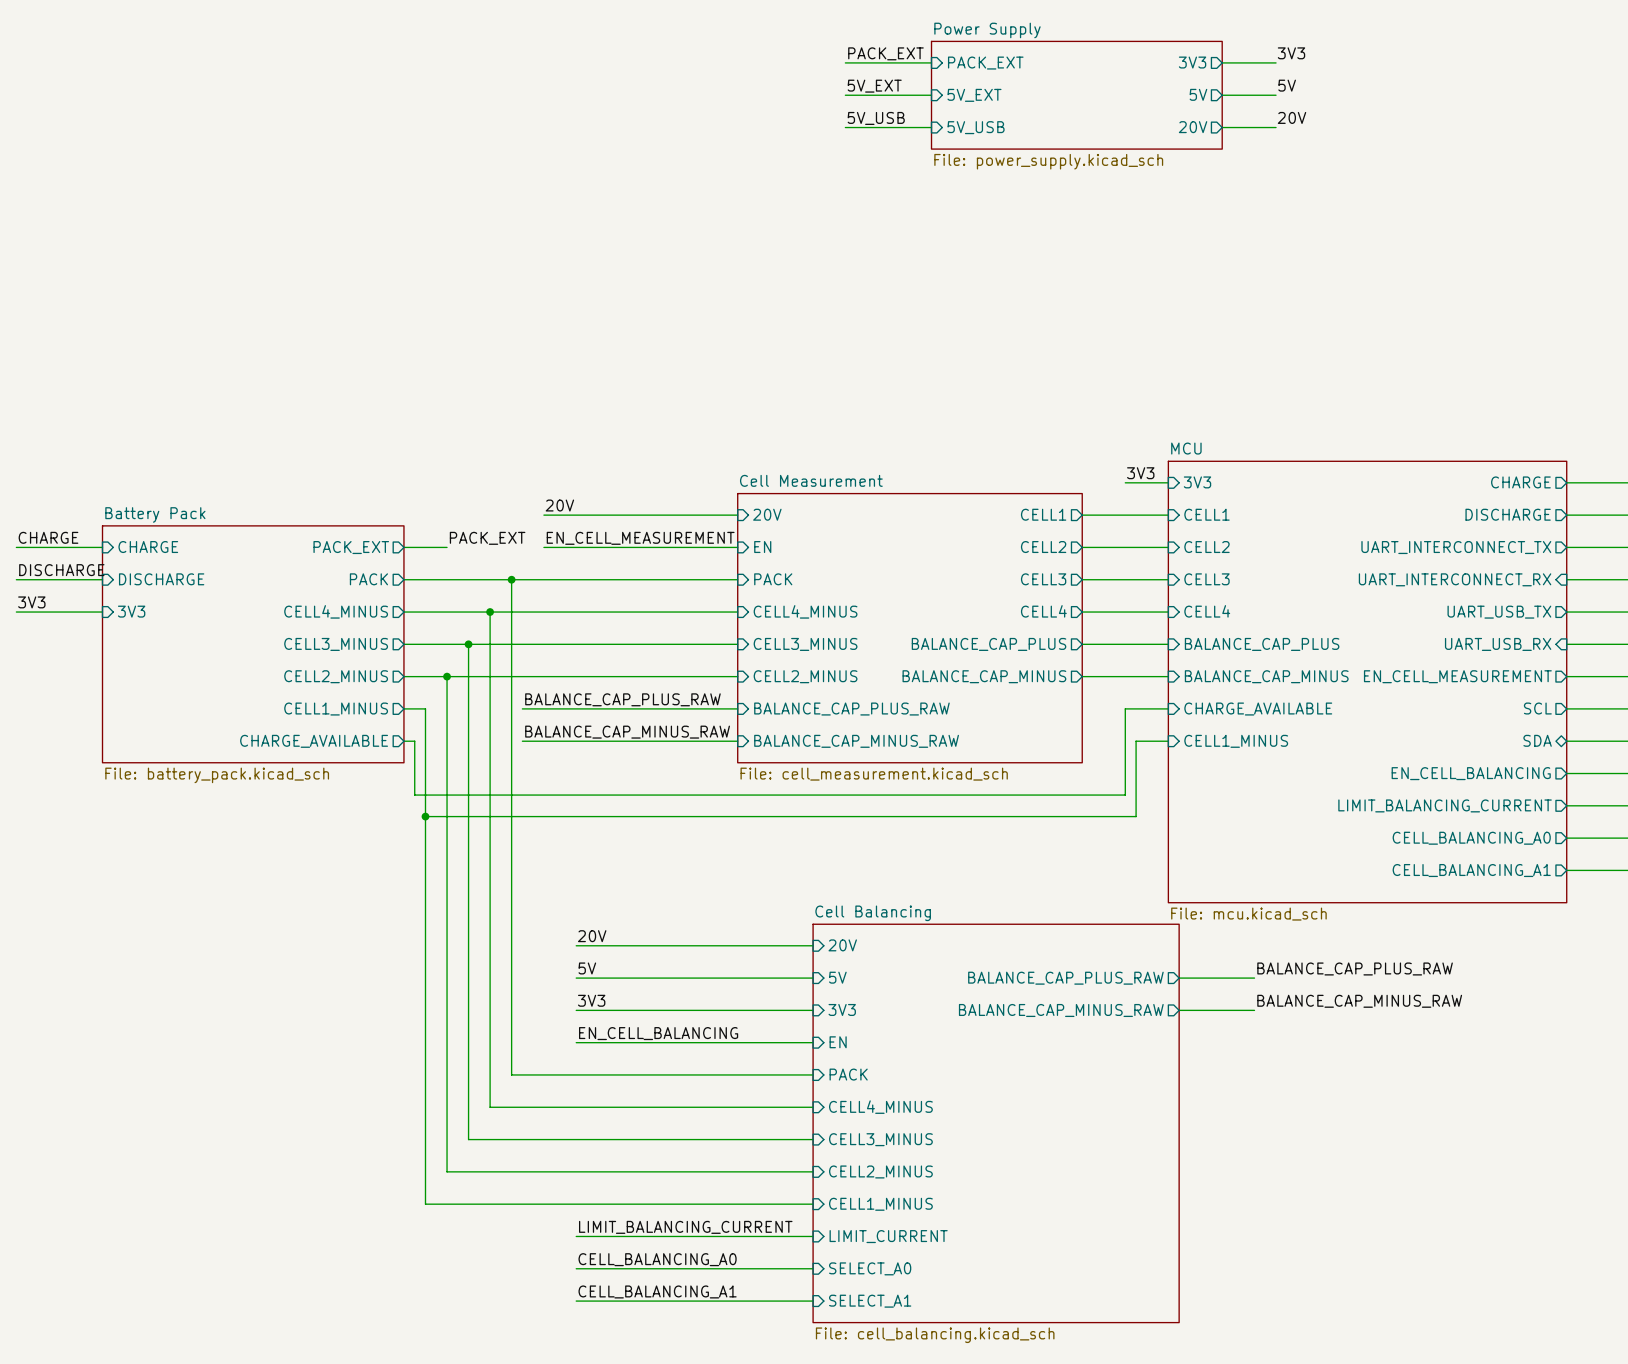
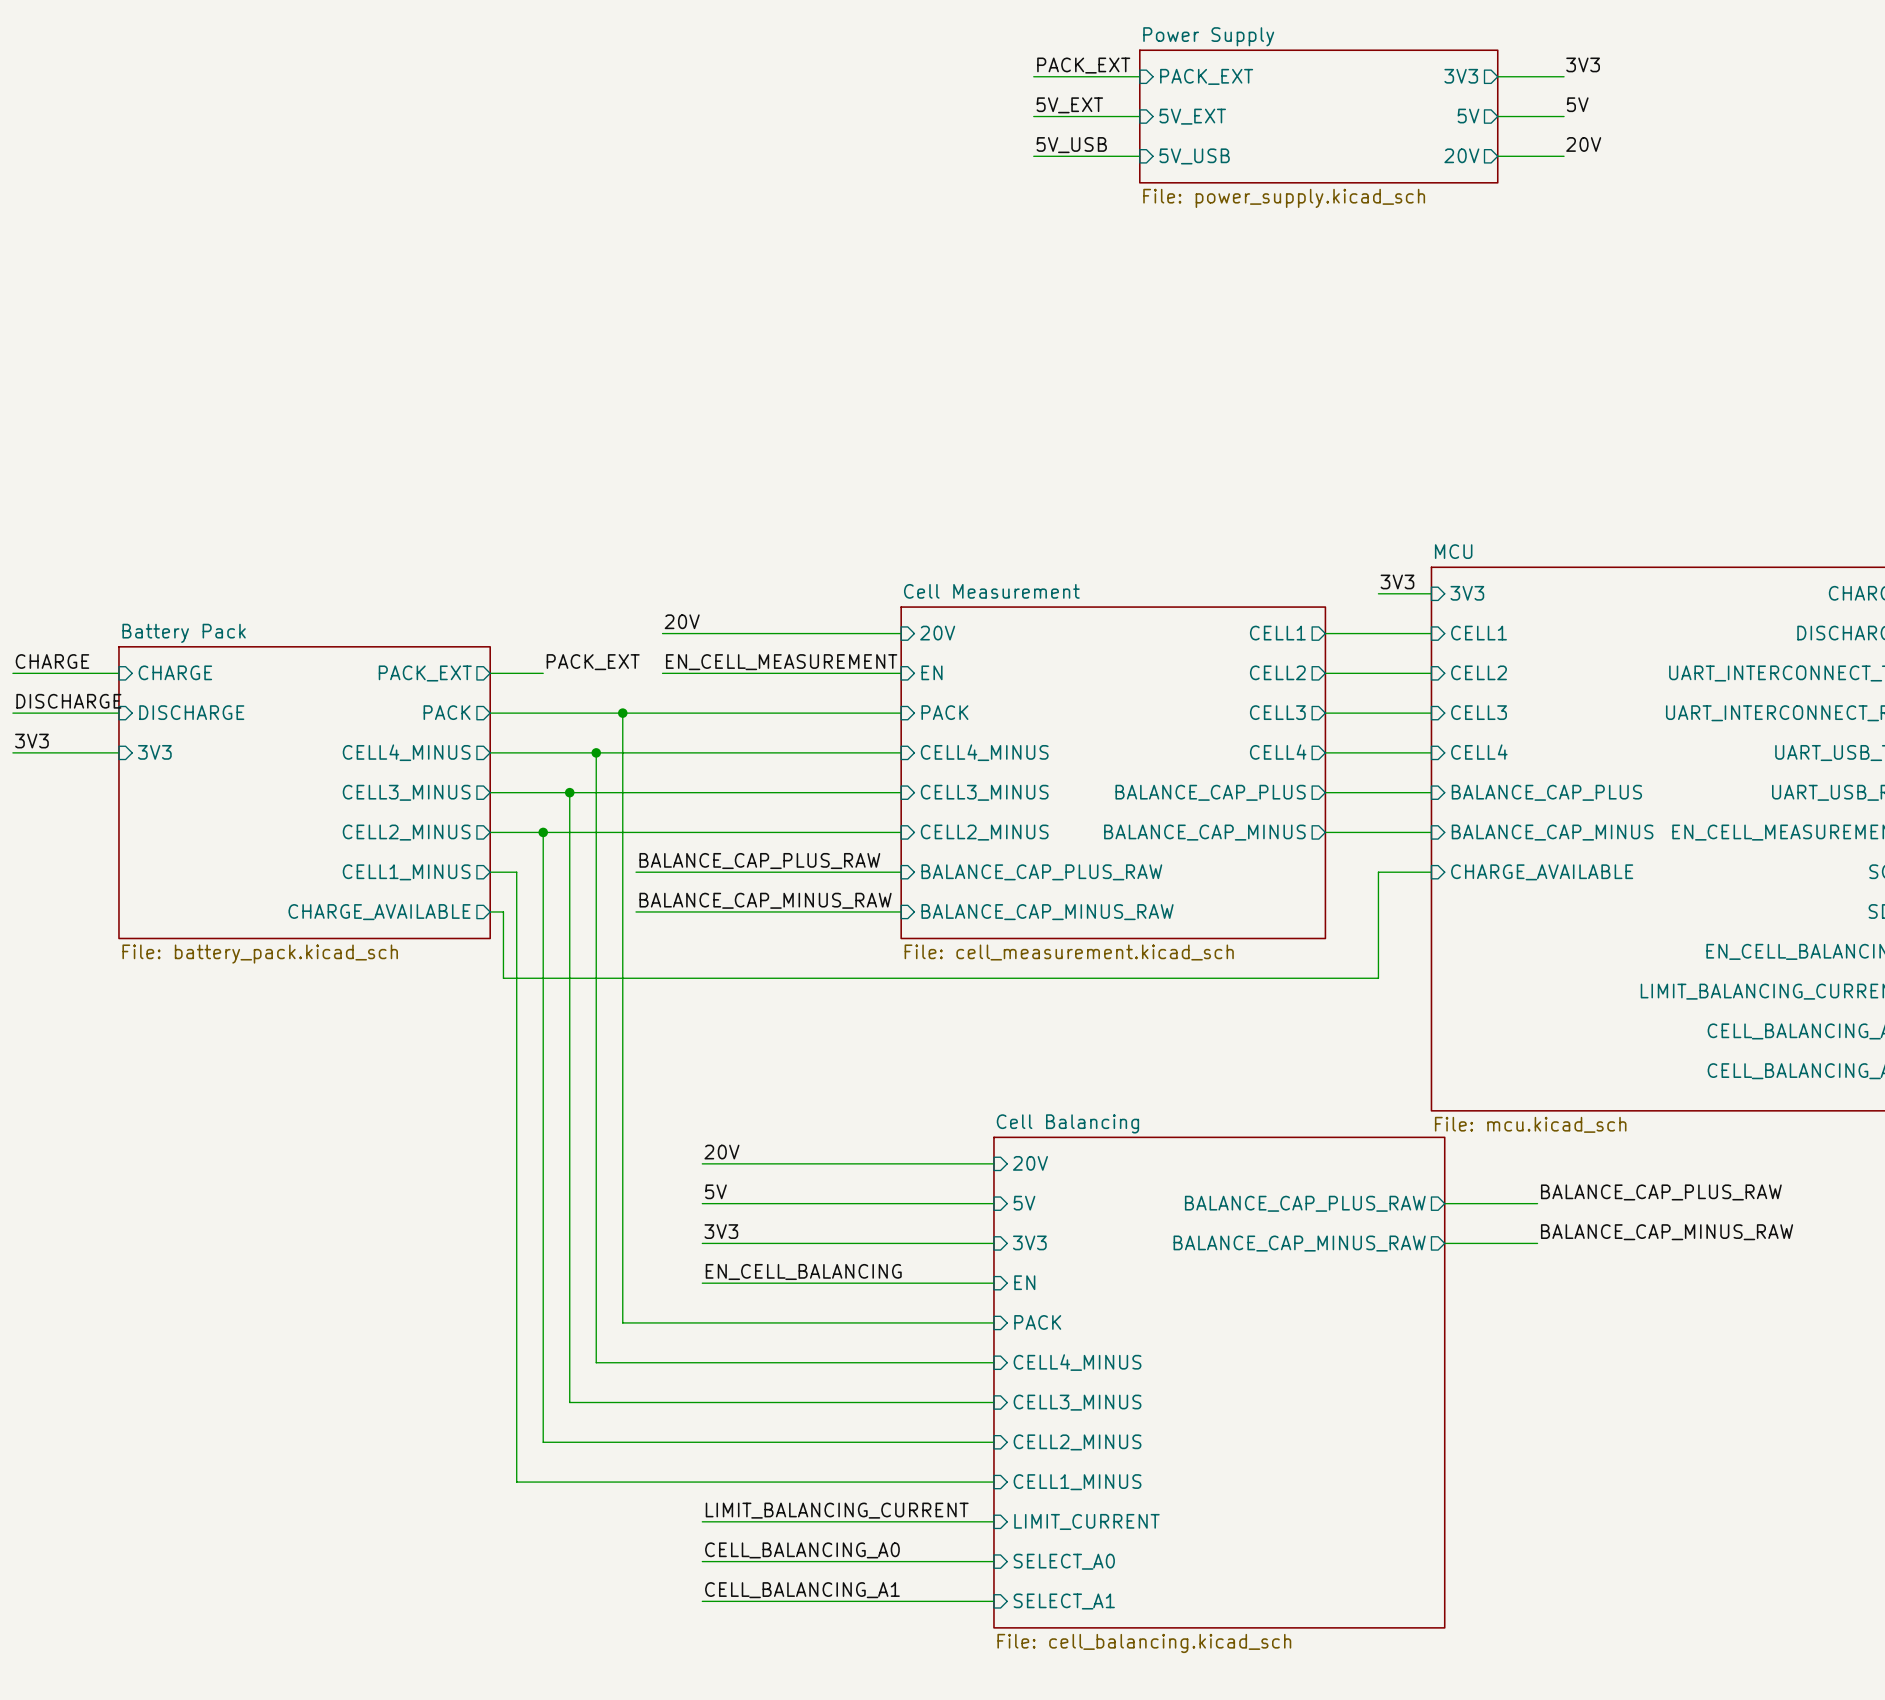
wire: (1168, 741) (1136, 741) (1136, 816) (425, 816) -> none
sheet pin: CELL1_MINUS (1236, 741) -> none
junction: (425, 816) -> none

